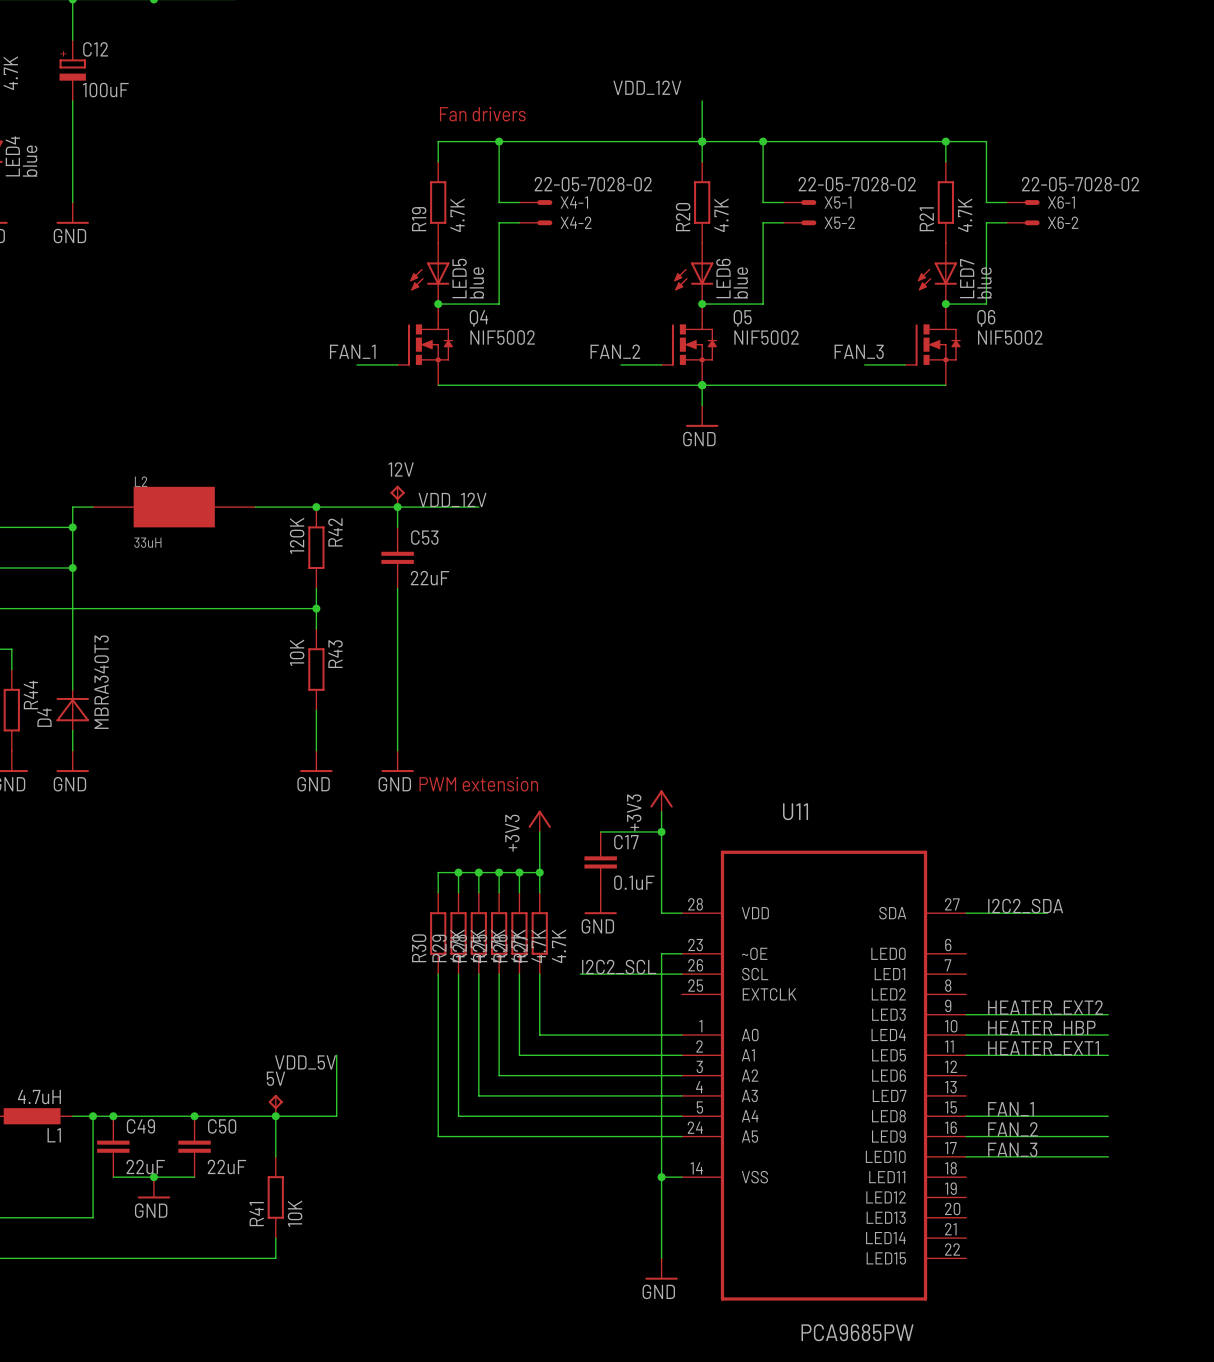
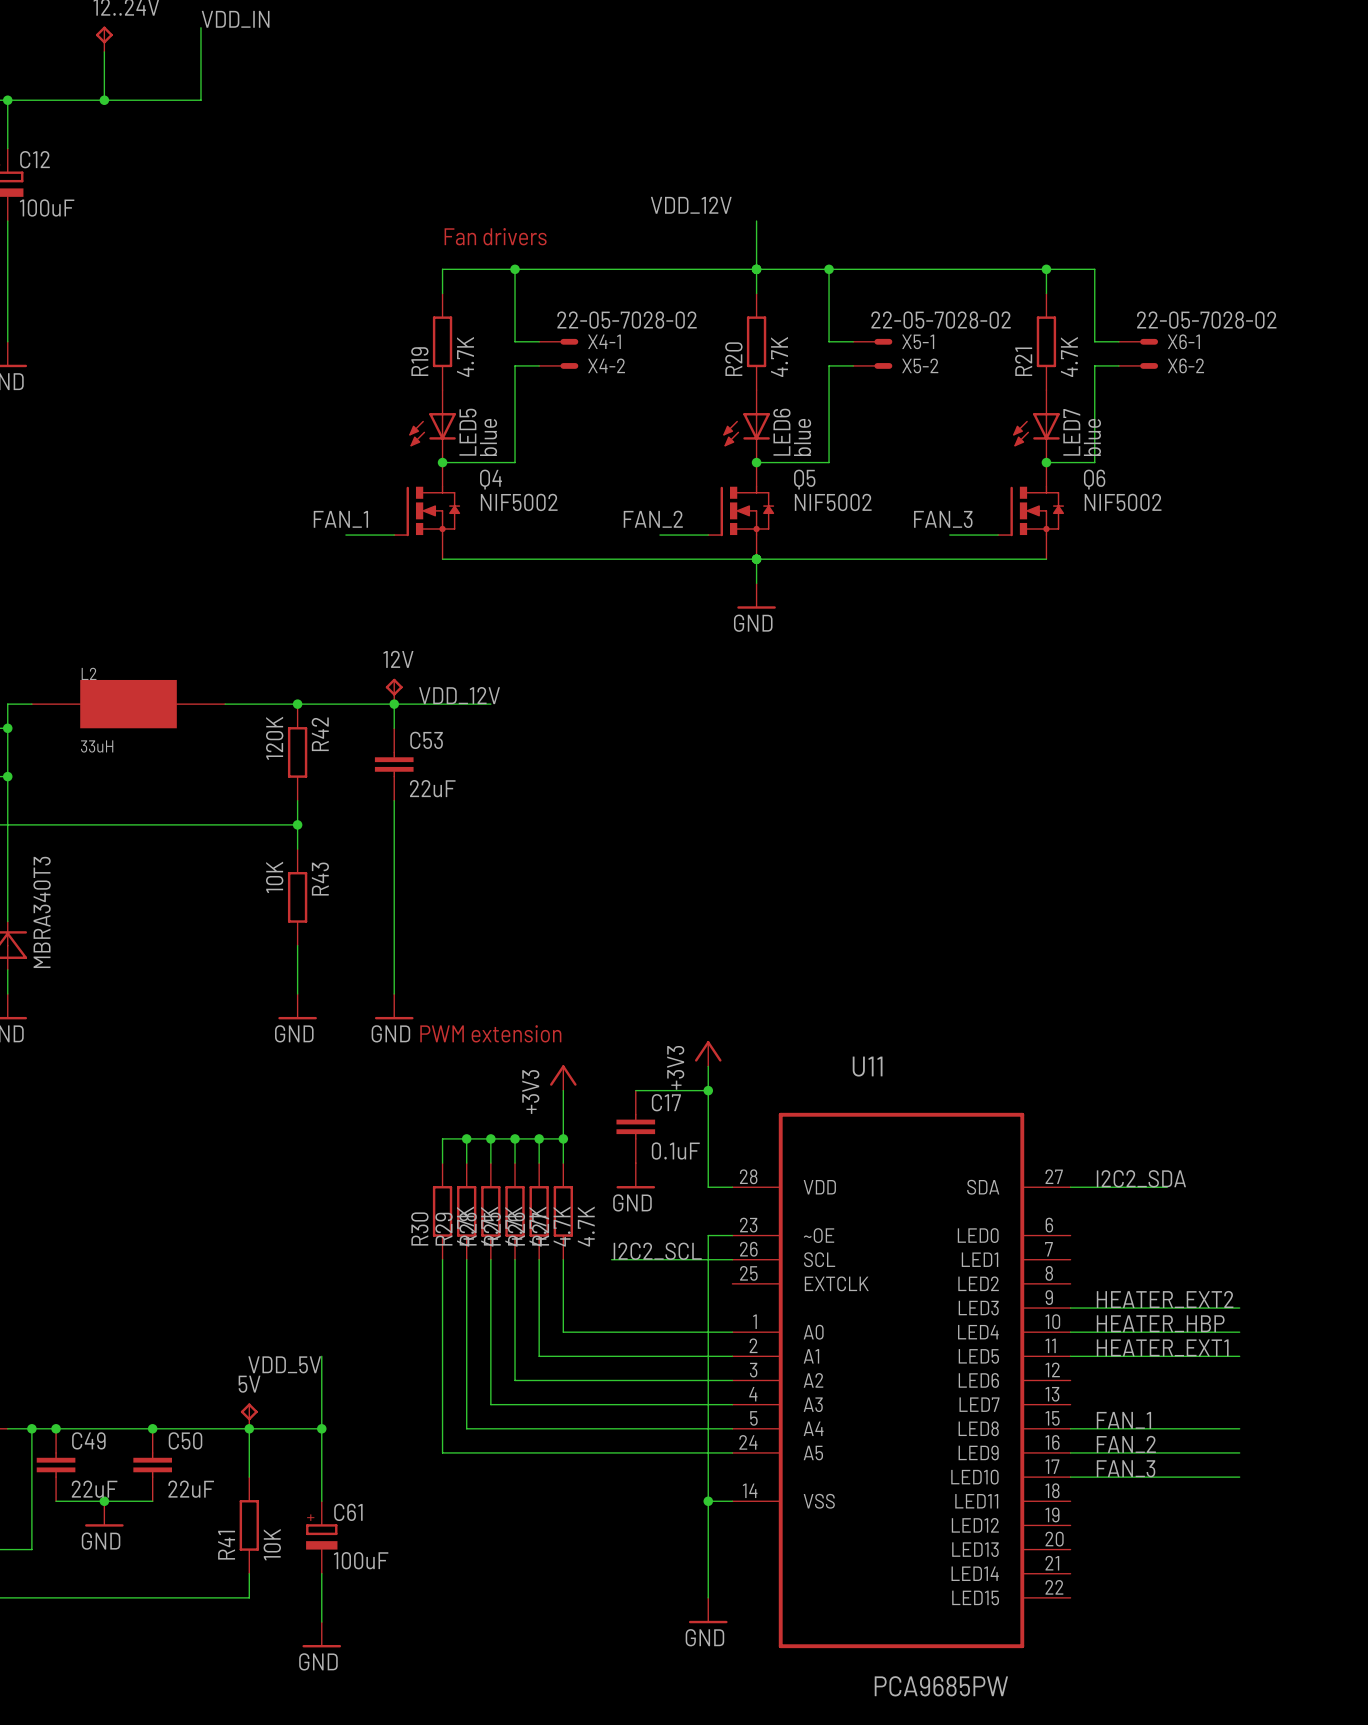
wire: none -> (321, 1428) (321, 1501)
junction: none -> (321, 1428)
C61: none -> 100uF (321, 1537)
wire: none -> (321, 1573) (321, 1622)
power symbol: none -> GND (321, 1634)

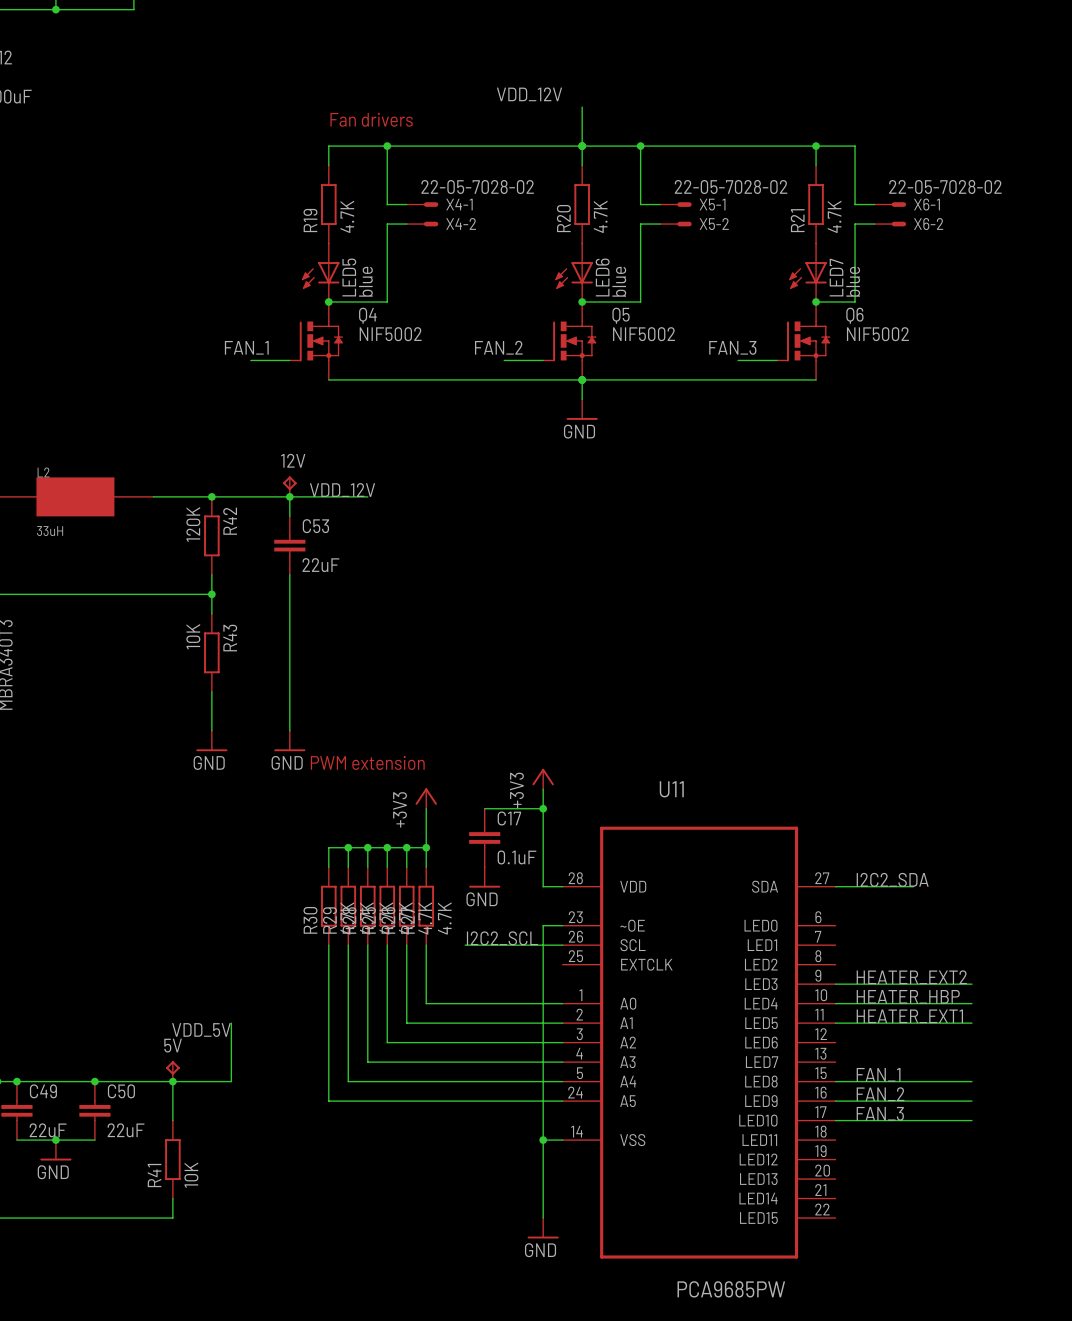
wire: (321, 1428) (321, 1501) -> none
junction: (321, 1428) -> none
C61: 100uF (321, 1537) -> none
wire: (321, 1573) (321, 1622) -> none
power symbol: GND (321, 1634) -> none

